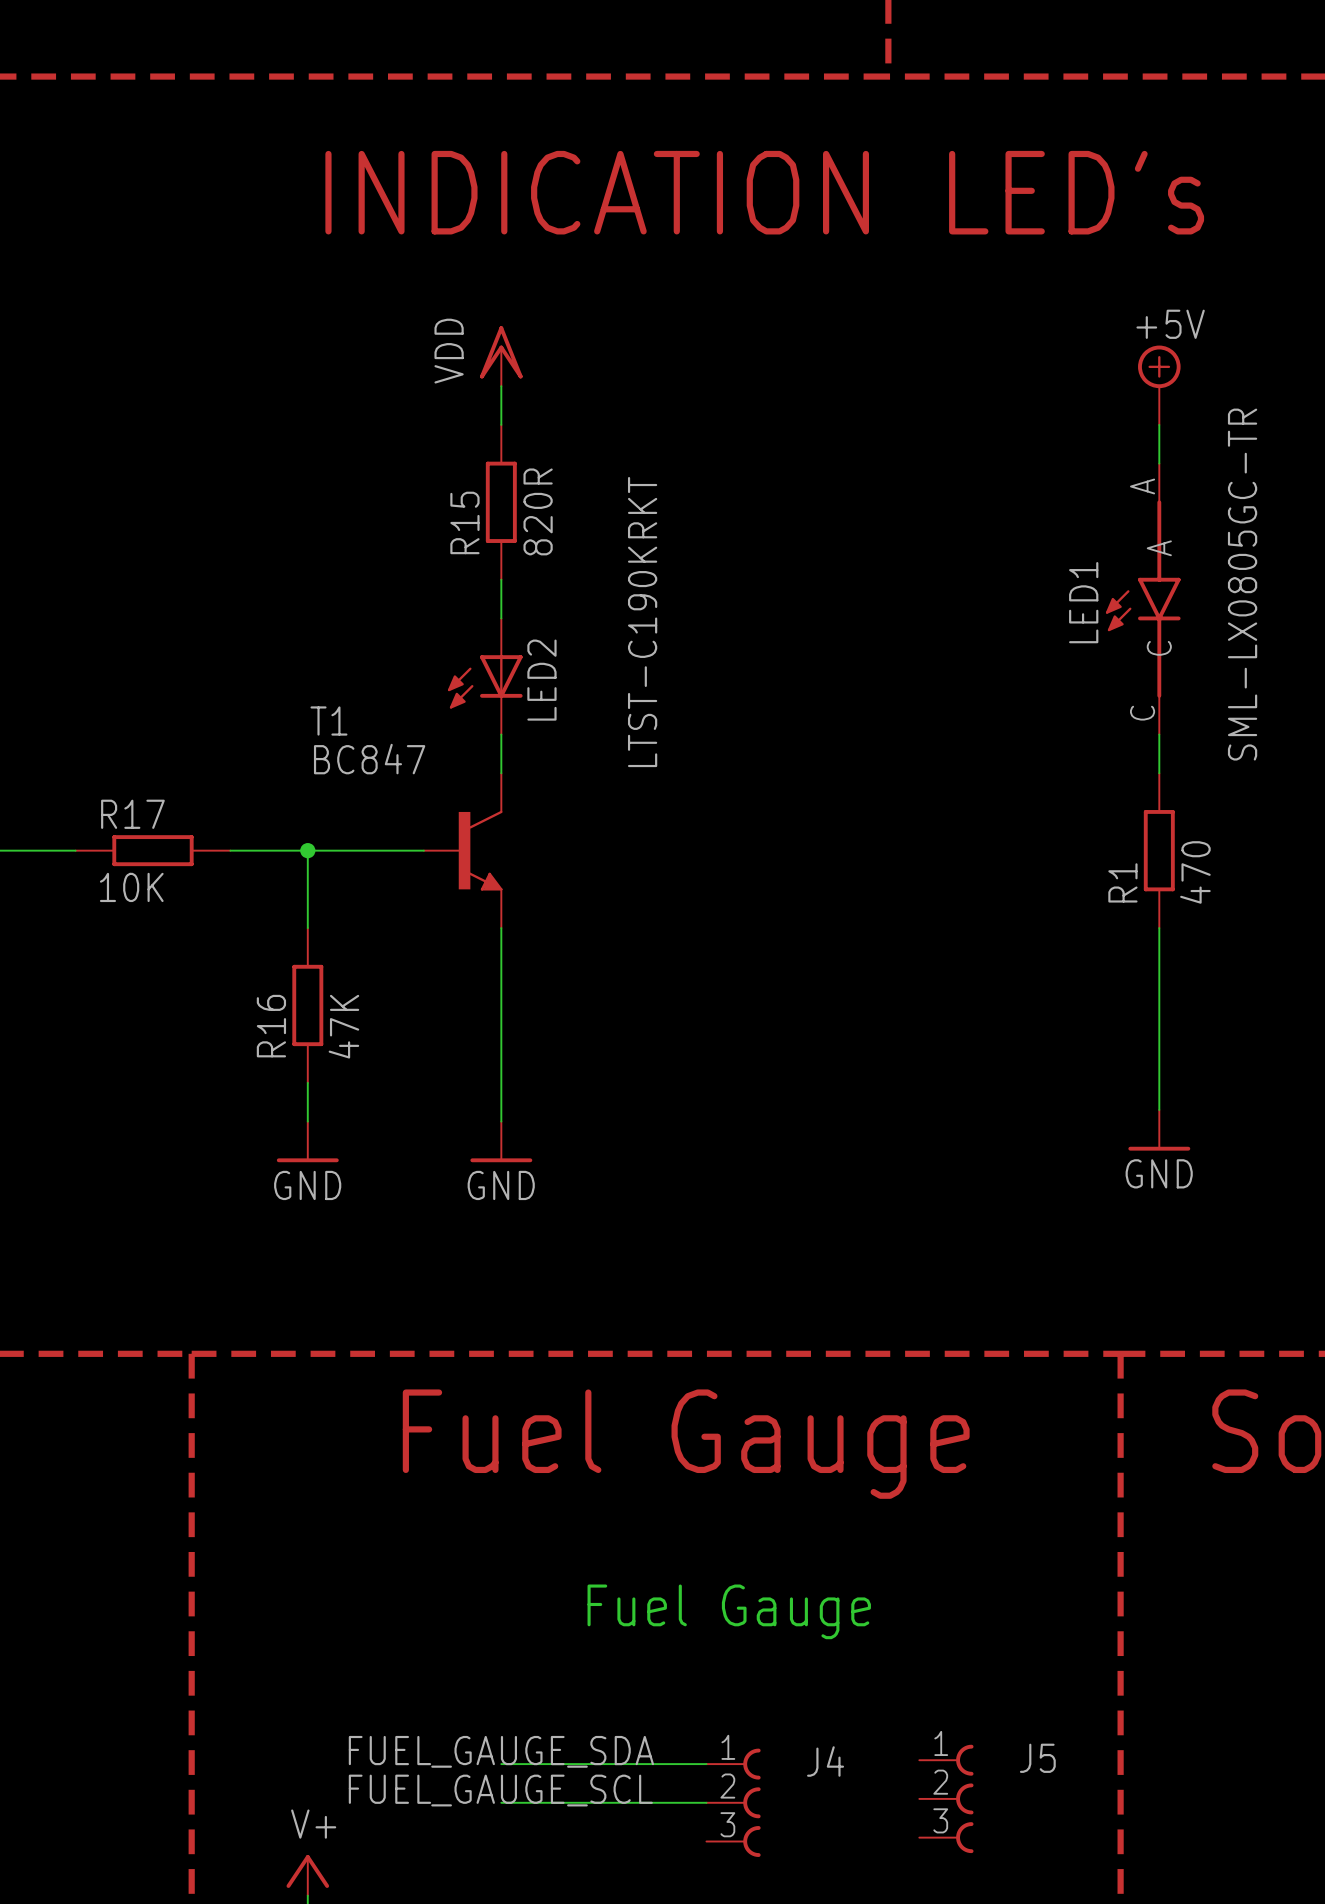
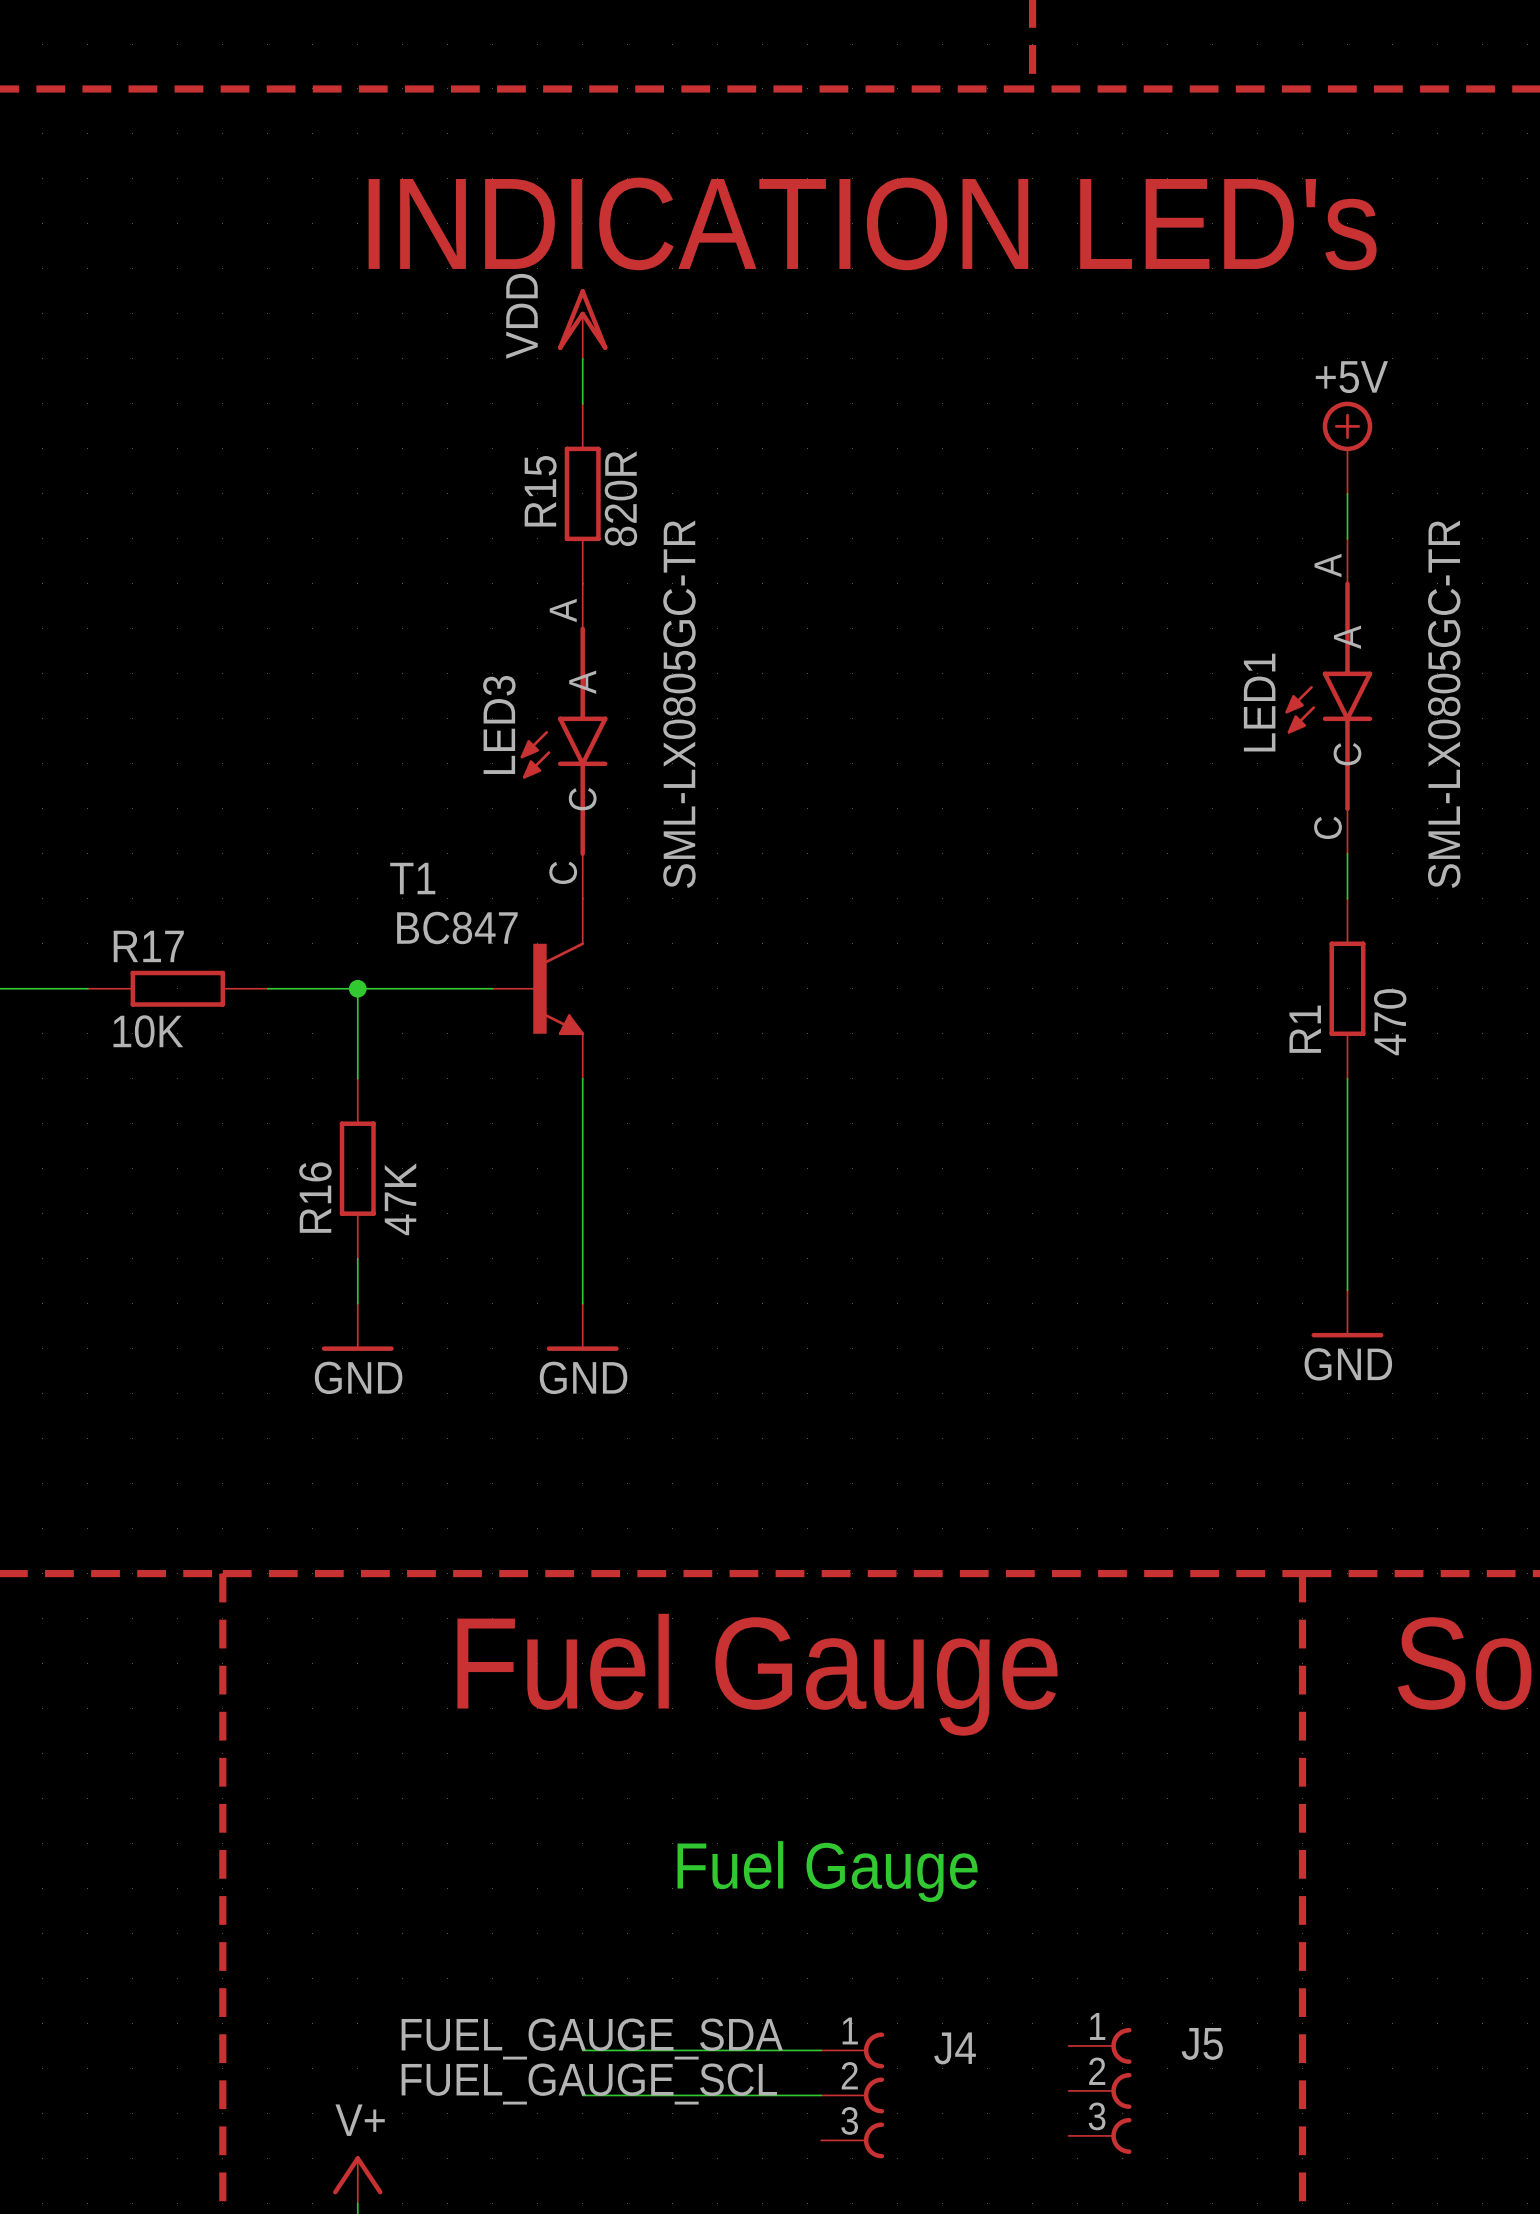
power symbol position: VDD (501, 356) -> VDD (582, 324)
wire: (501, 386) (501, 424) -> (582, 358) (582, 403)
R15 position: (501, 502) -> (582, 493)
R15 value position: 820R (538, 511) -> 820R (620, 498)
R15 name position: R15 (464, 522) -> R15 (540, 491)
text: LTST-C190KRKT (642, 622) -> none
LED3: none -> SML-LX0805GC-TR (564, 741)
LED2: (485, 676) -> none
T1 name position: T1 (328, 721) -> T1 (412, 878)
T1 value position: BC847 (369, 759) -> BC847 (457, 928)

